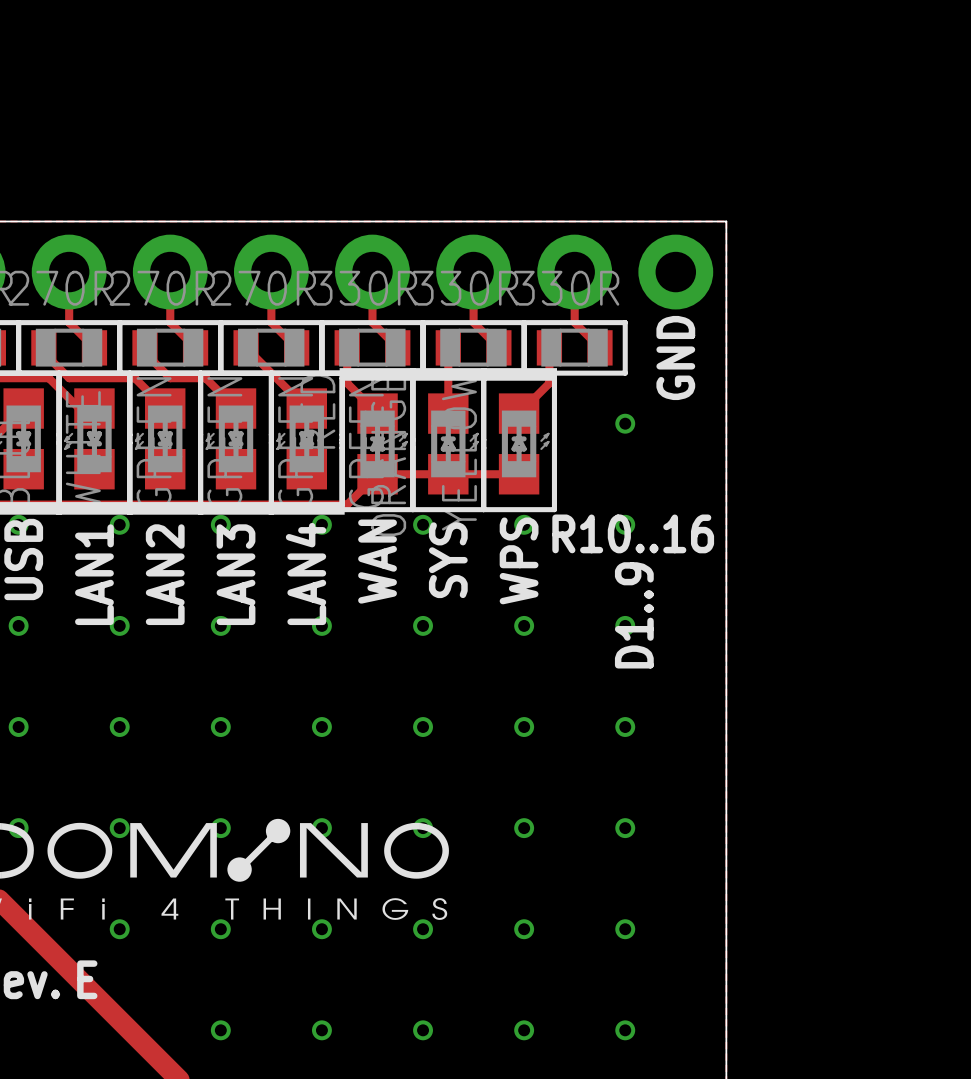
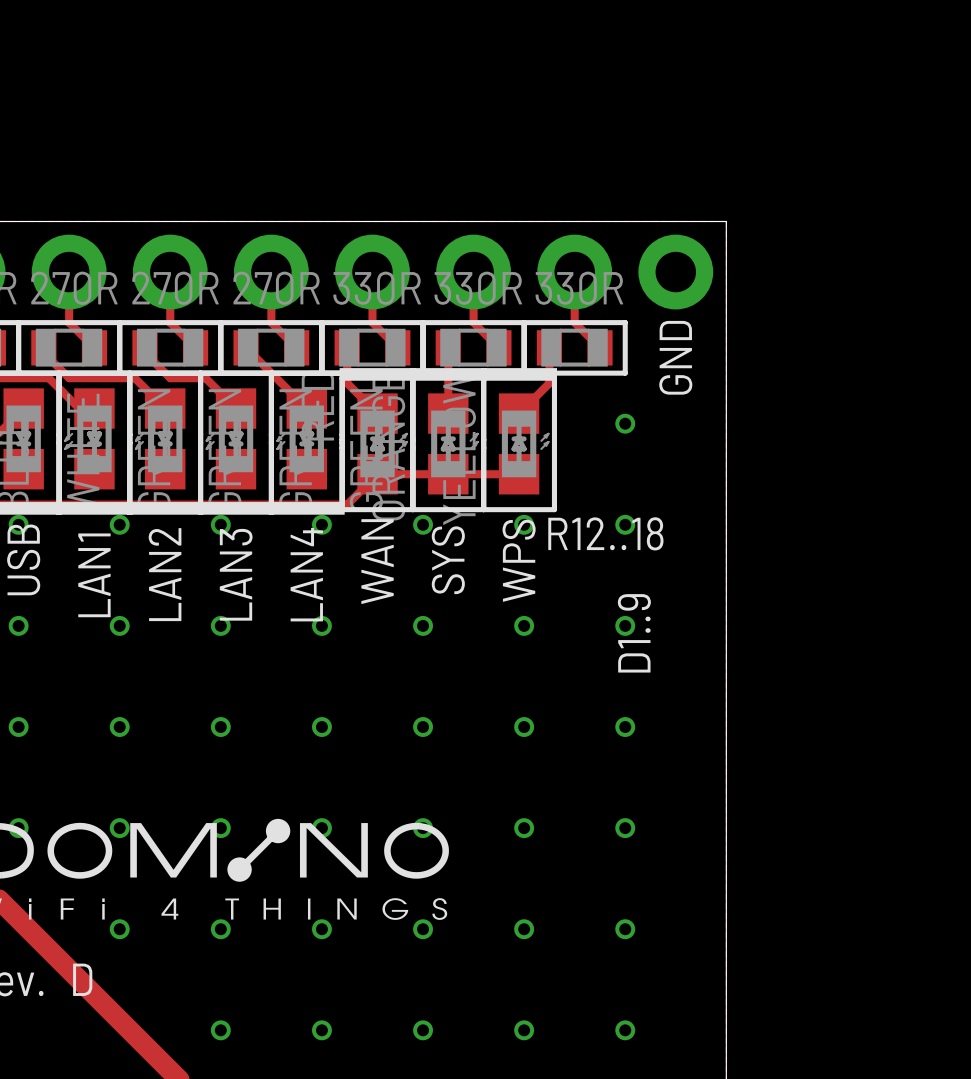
text: R10..16 (633, 533) -> R12..18 (605, 533)
text: E (87, 979) -> D (82, 979)

